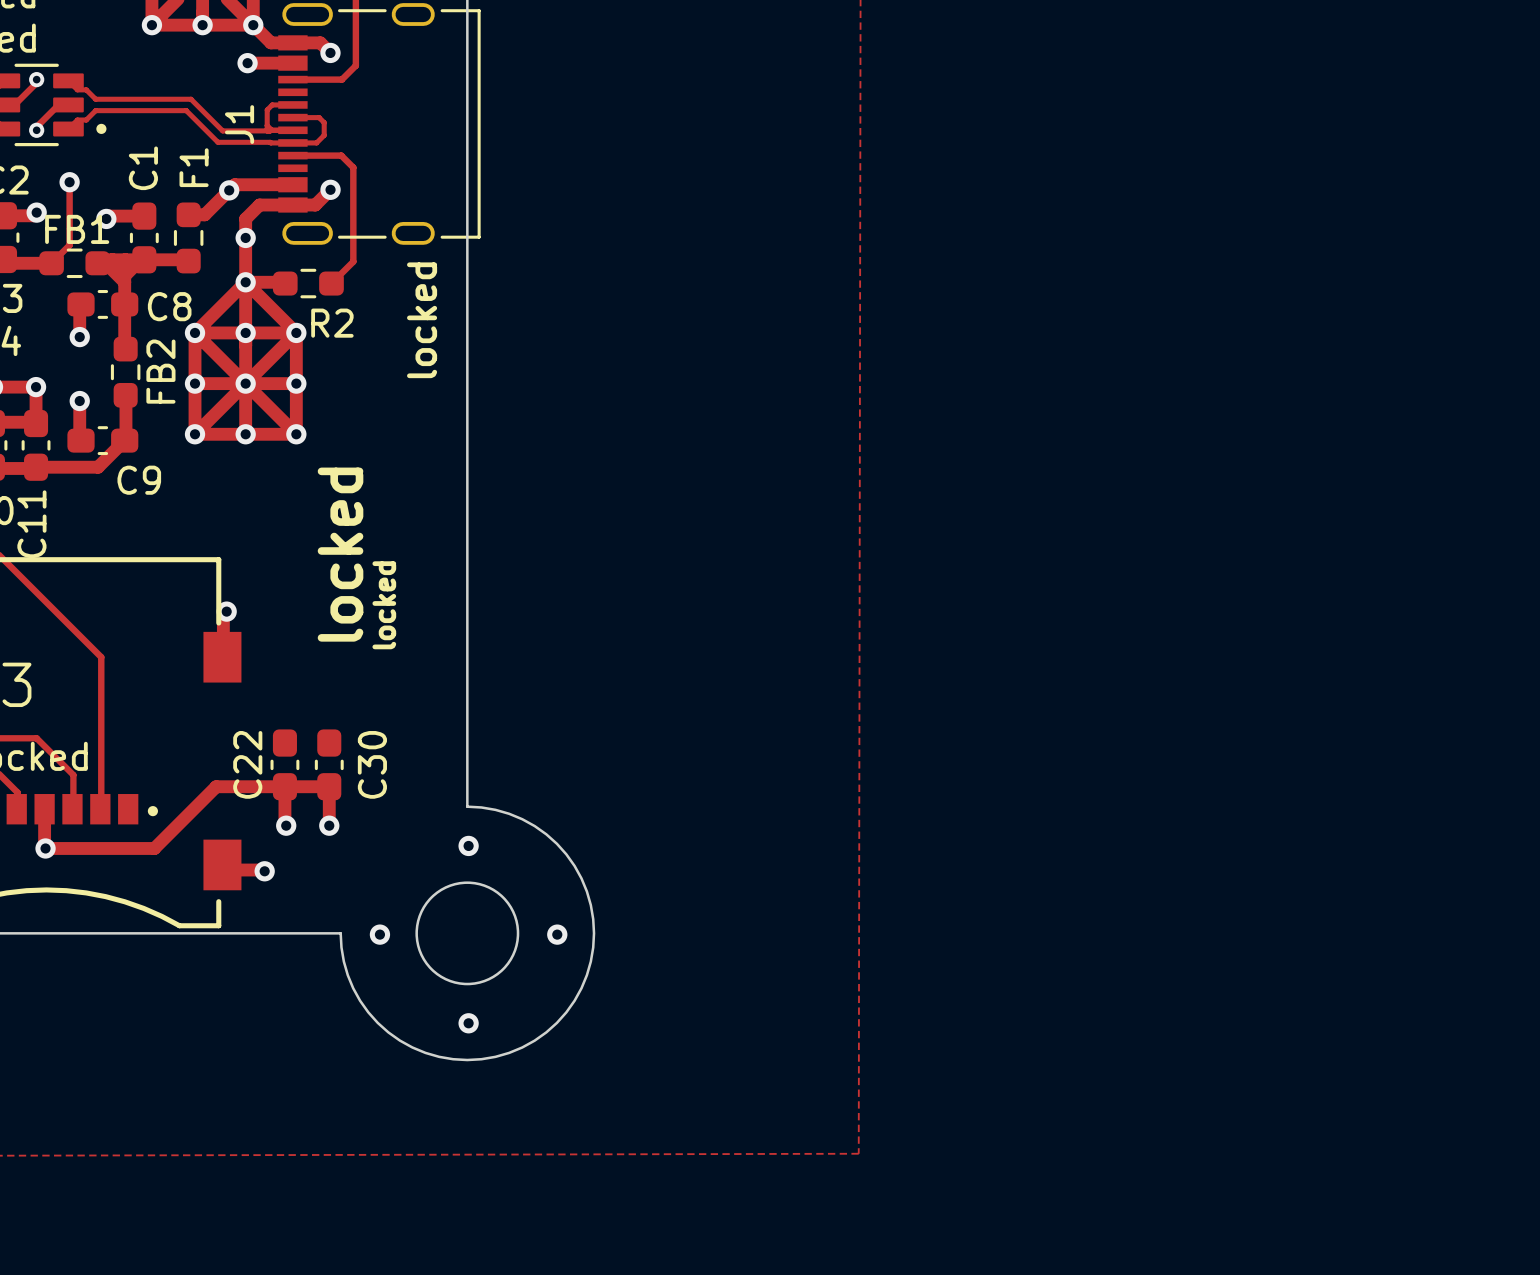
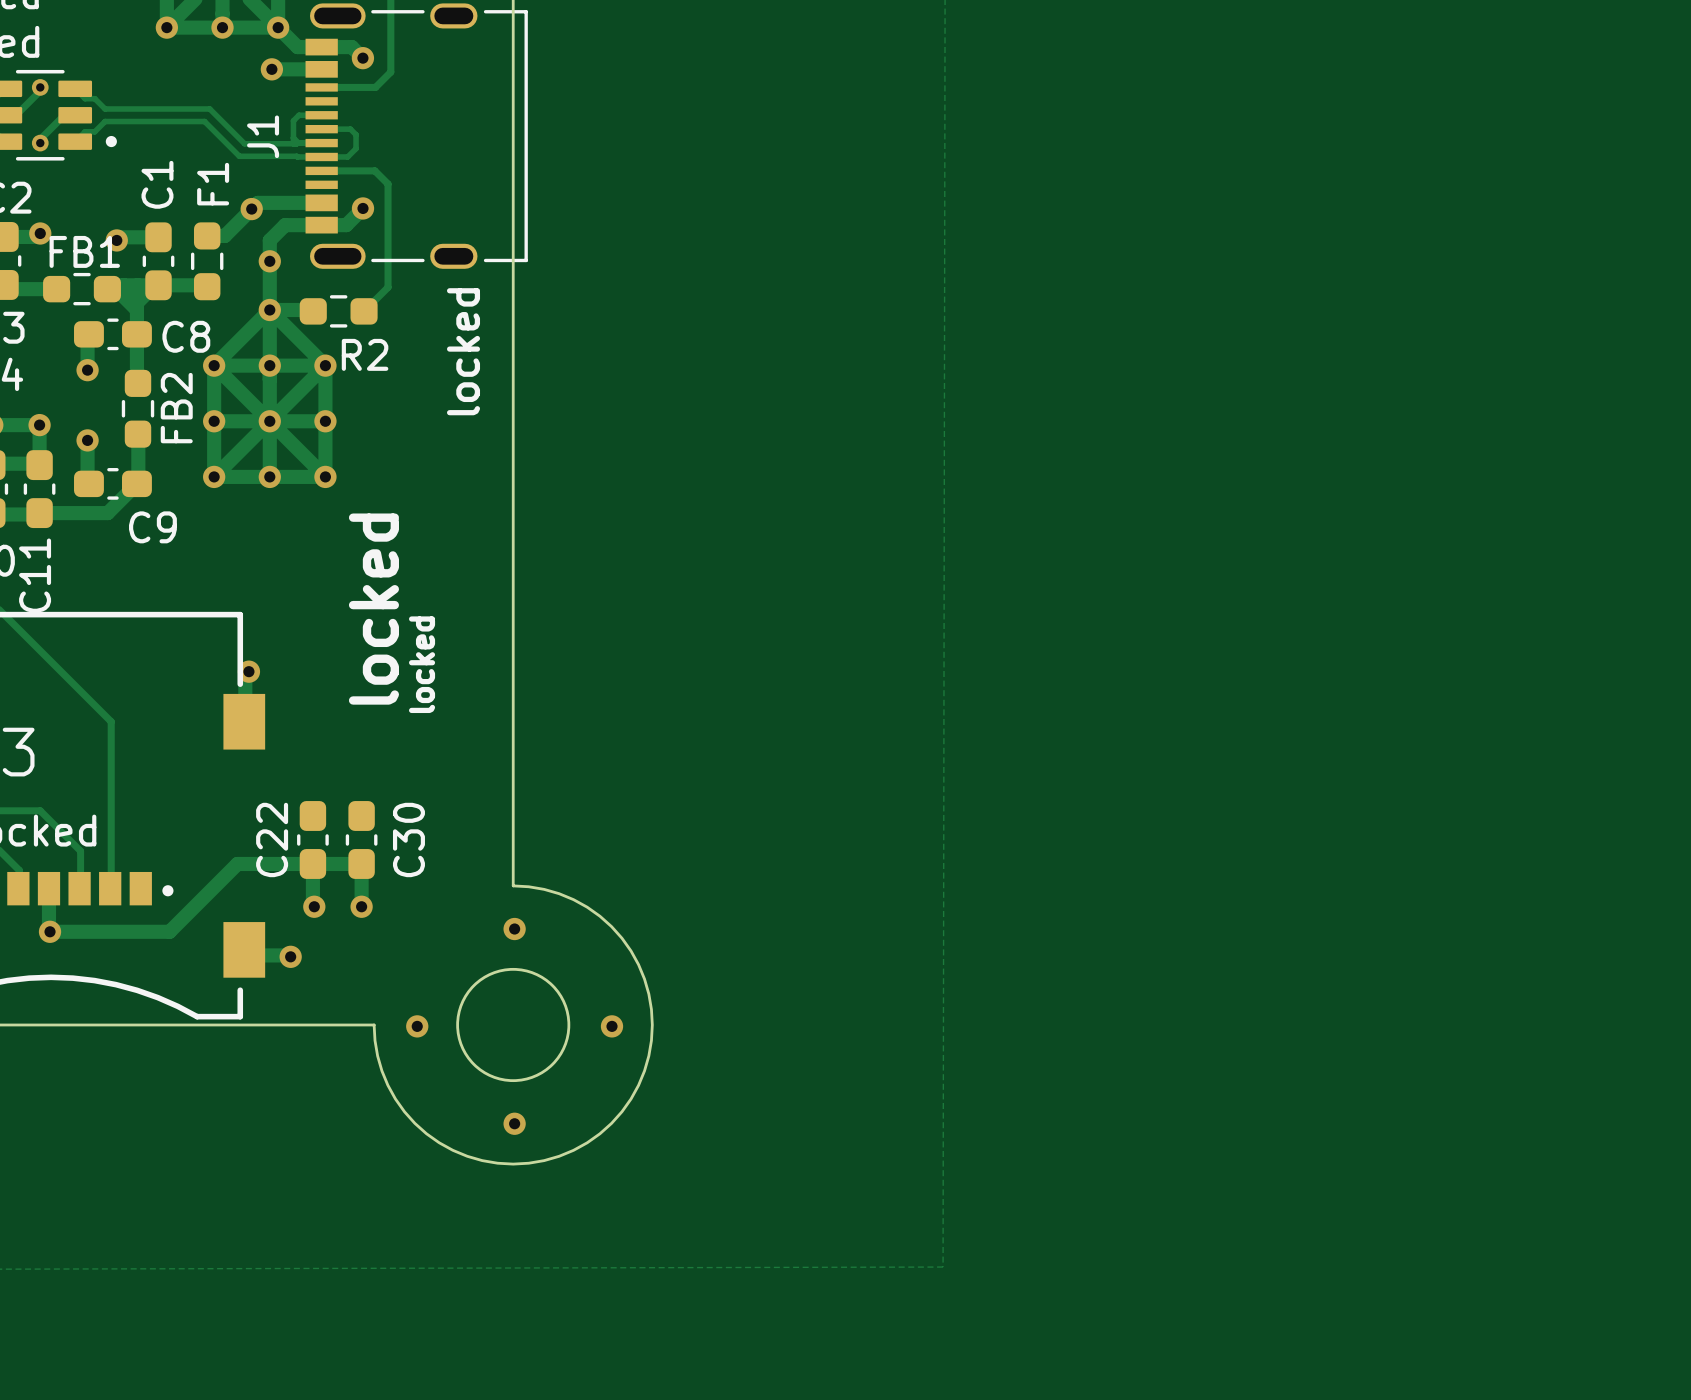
track: (69, 182) (69, 245) (51, 263) -> none
via: (69, 182) -> none

